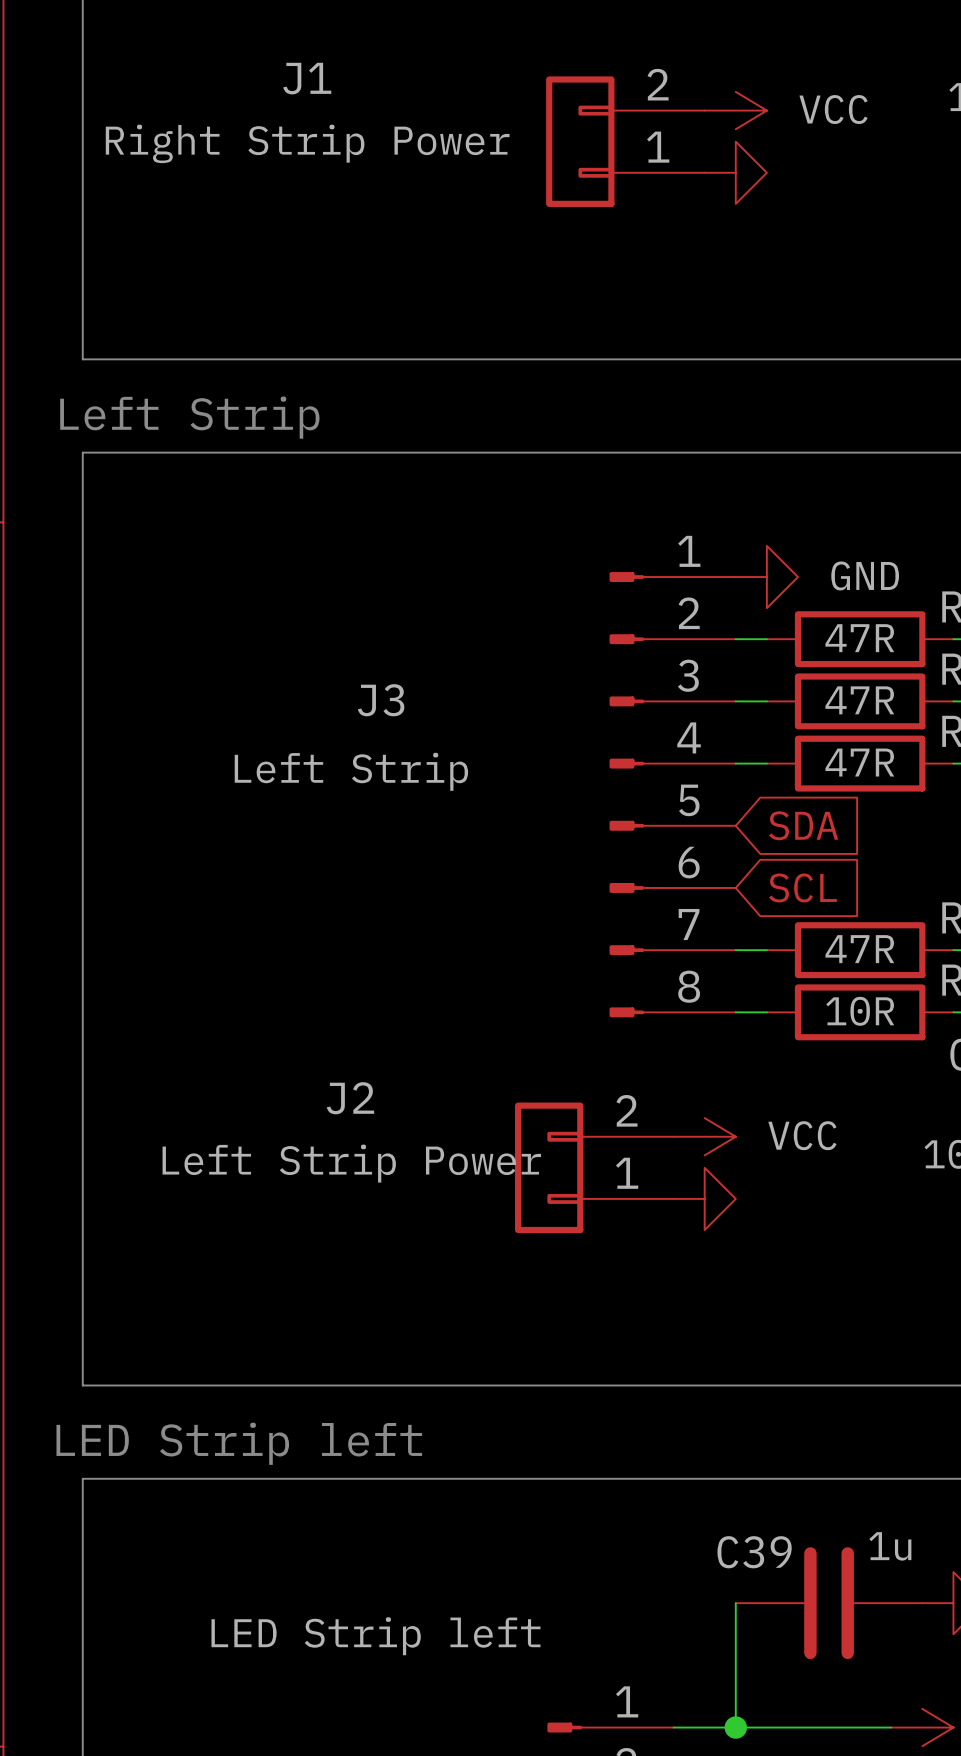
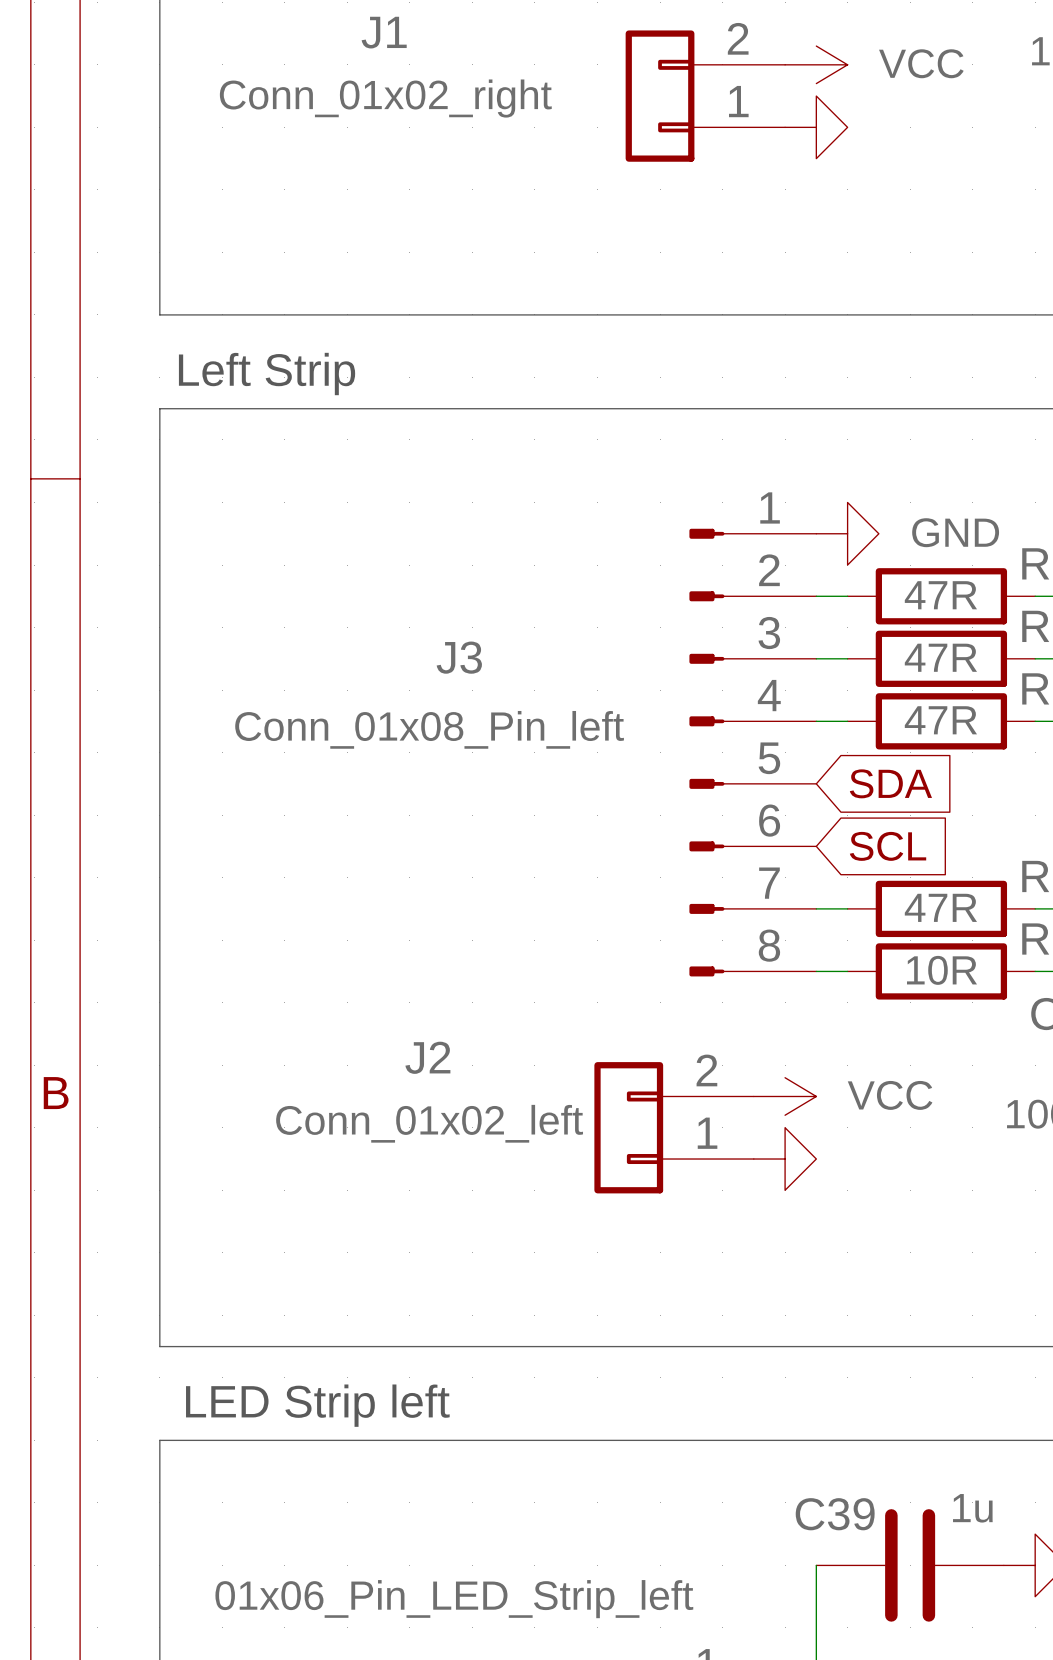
J1 value: Right Strip Power (307, 143) -> Conn_01x02_right (385, 98)
J3 value: Left Strip (351, 771) -> Conn_01x08_Pin_left (429, 729)
J2 value: Left Strip Power (351, 1163) -> Conn_01x02_left (429, 1123)
part value: LED Strip left (376, 1636) -> 01x06_Pin_LED_Strip_left (454, 1599)

